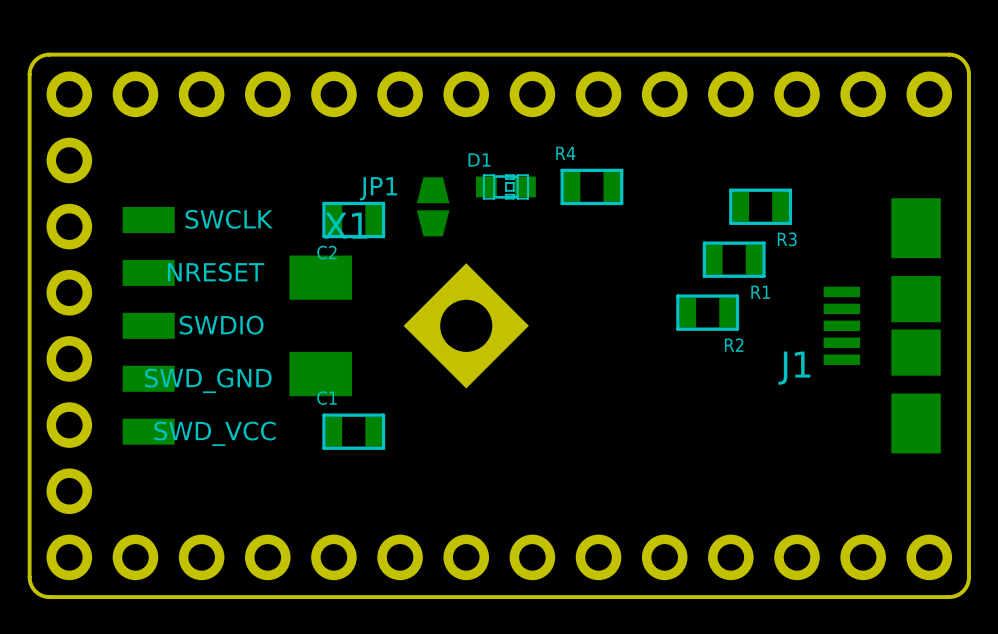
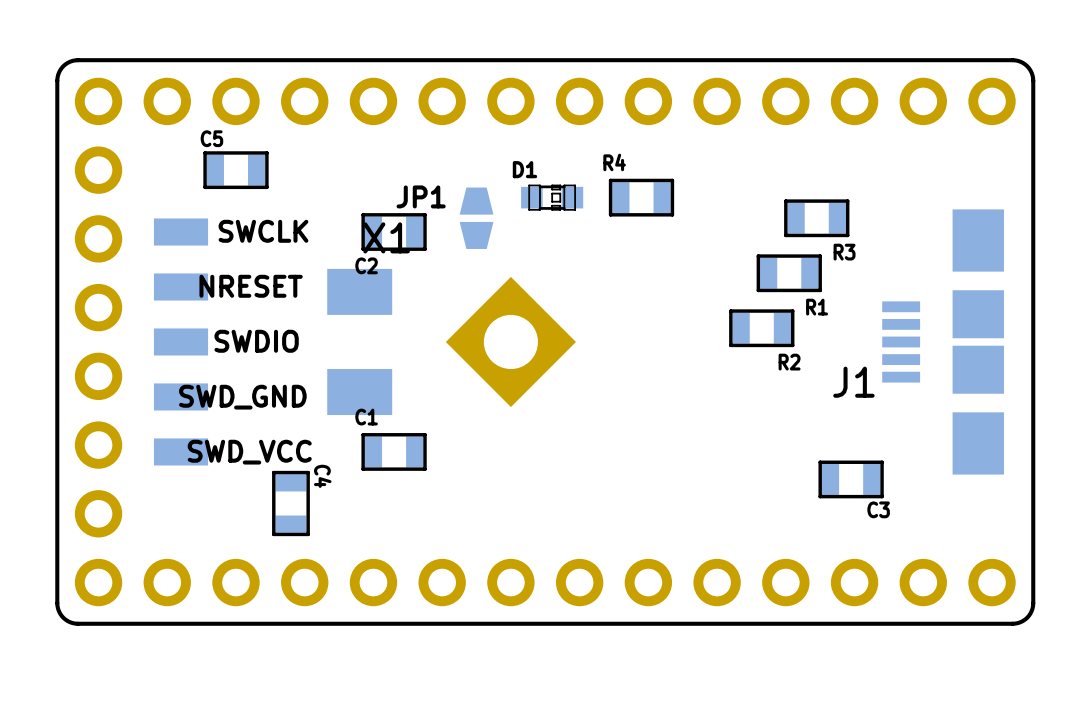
C5: none -> (235, 170)
C3: none -> (851, 479)
C4: none -> (290, 503)

